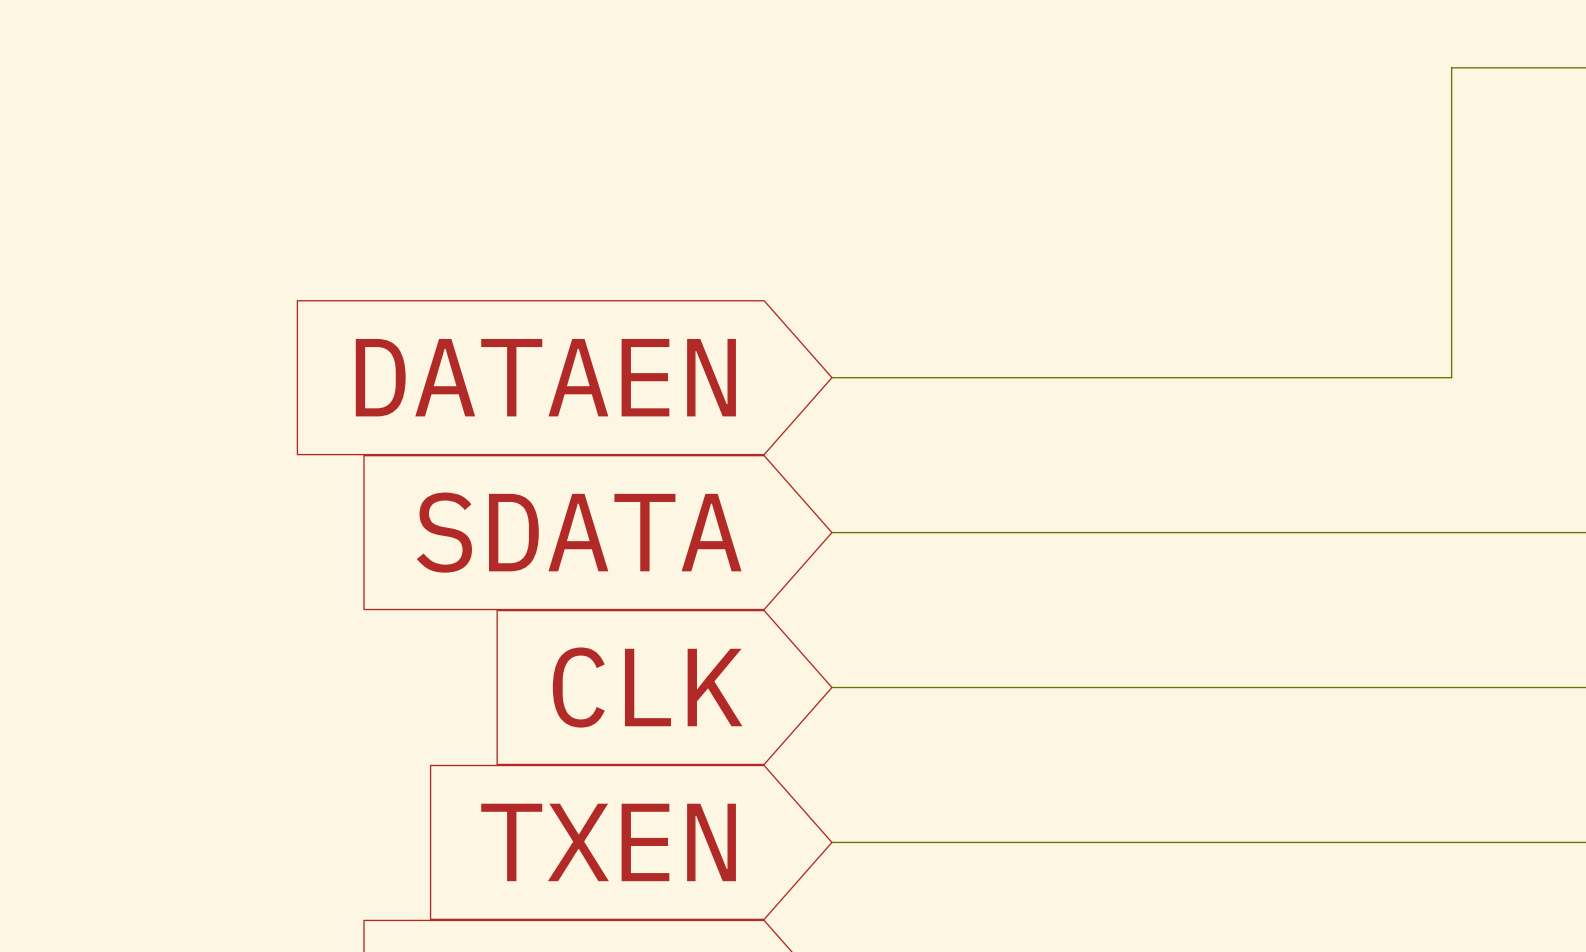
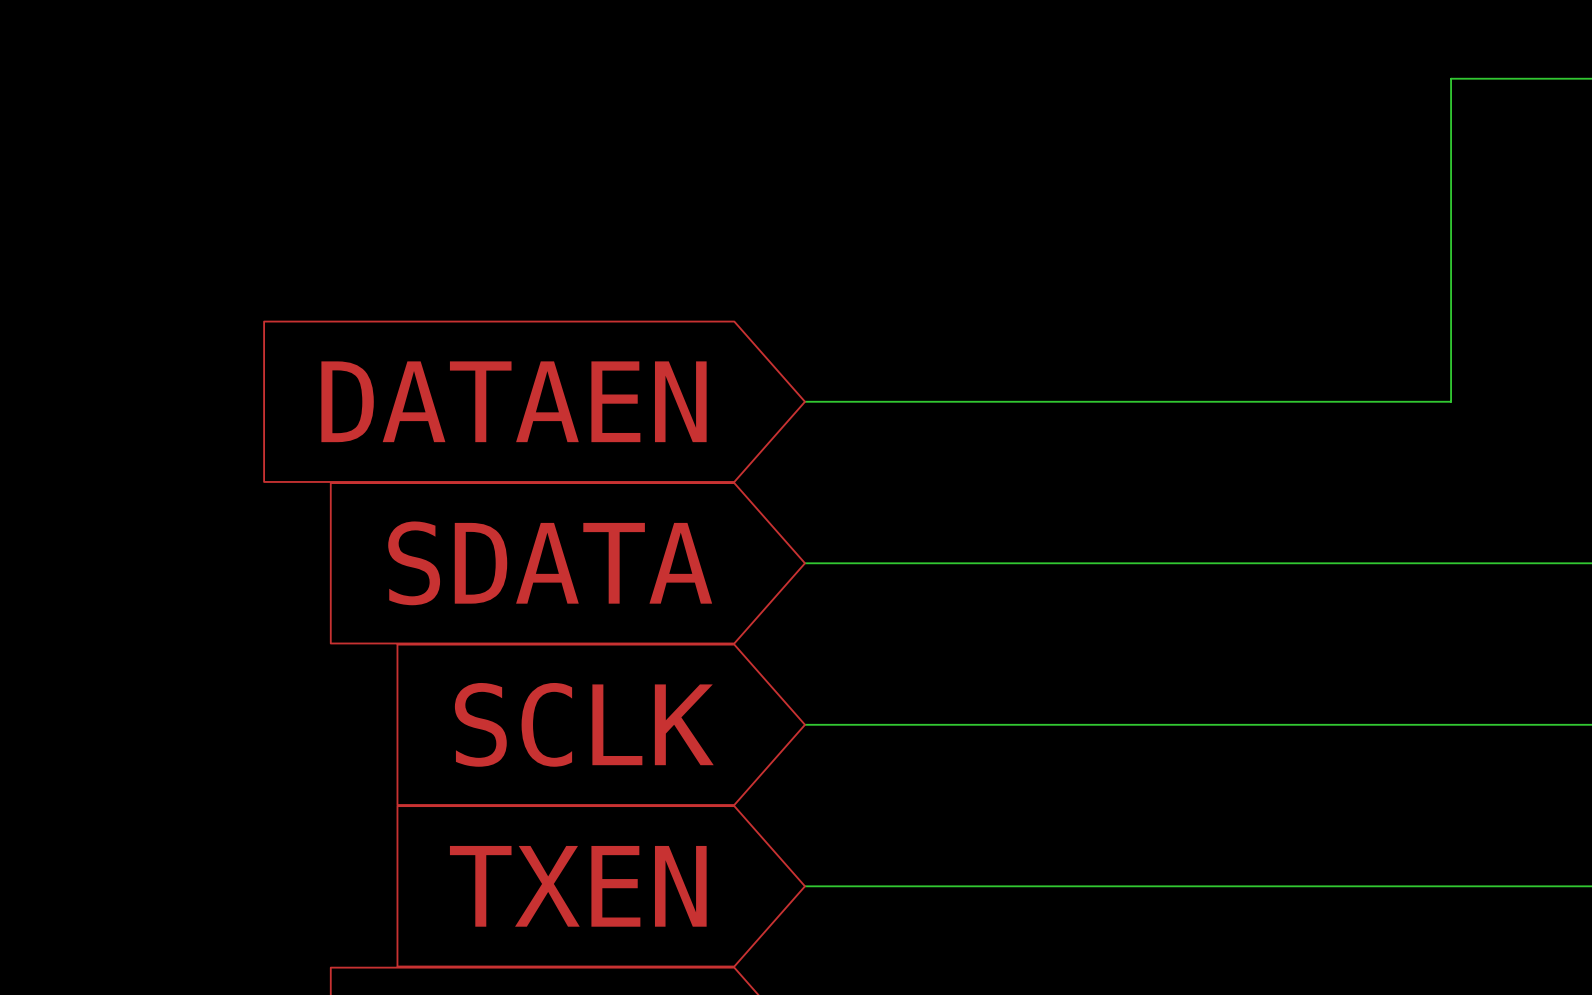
global label: CLK (647, 687) -> SCLK (584, 724)

